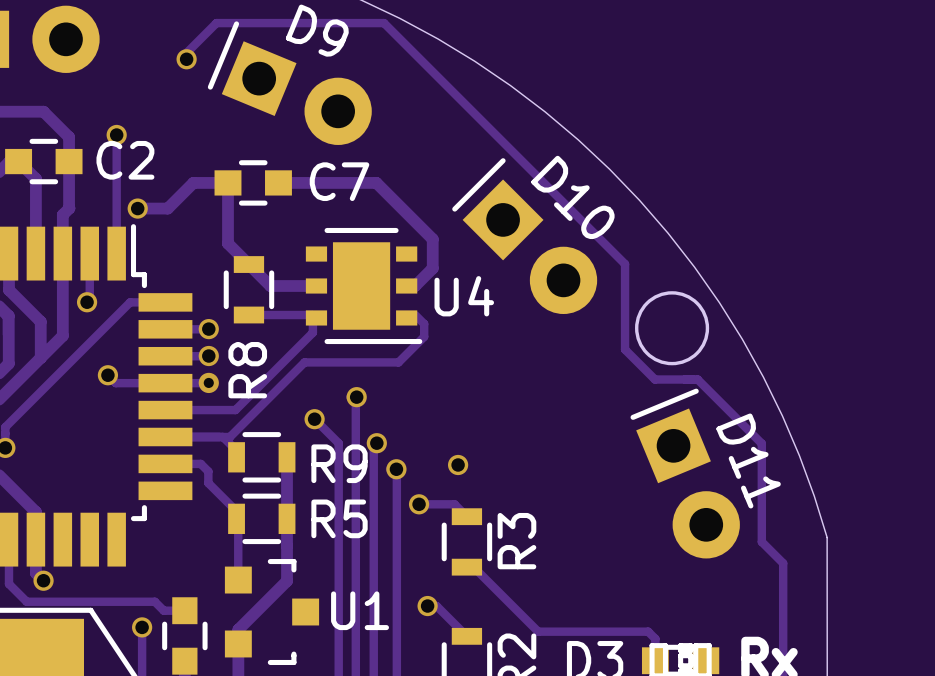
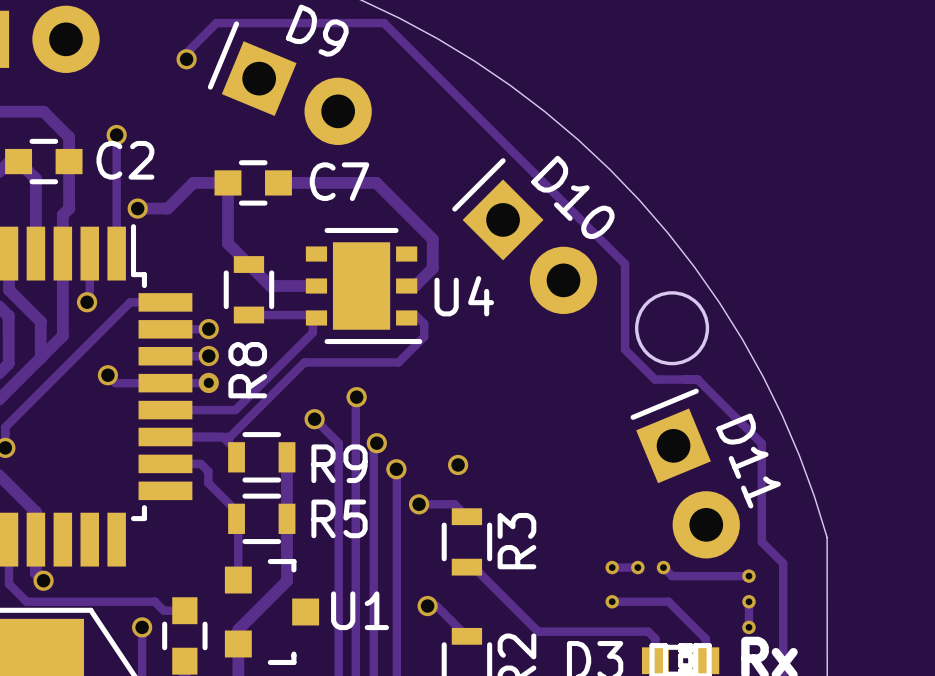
track: none -> (612, 567) (637, 567)
via: none -> (612, 567)
via: none -> (637, 567)
track: none -> (663, 567) (672, 576) (748, 576)
via: none -> (663, 567)
via: none -> (748, 576)
track: none -> (612, 601) (668, 601) (705, 638) (705, 660)
via: none -> (612, 601)
track: none -> (748, 601) (748, 627)
via: none -> (748, 601)
via: none -> (748, 627)

